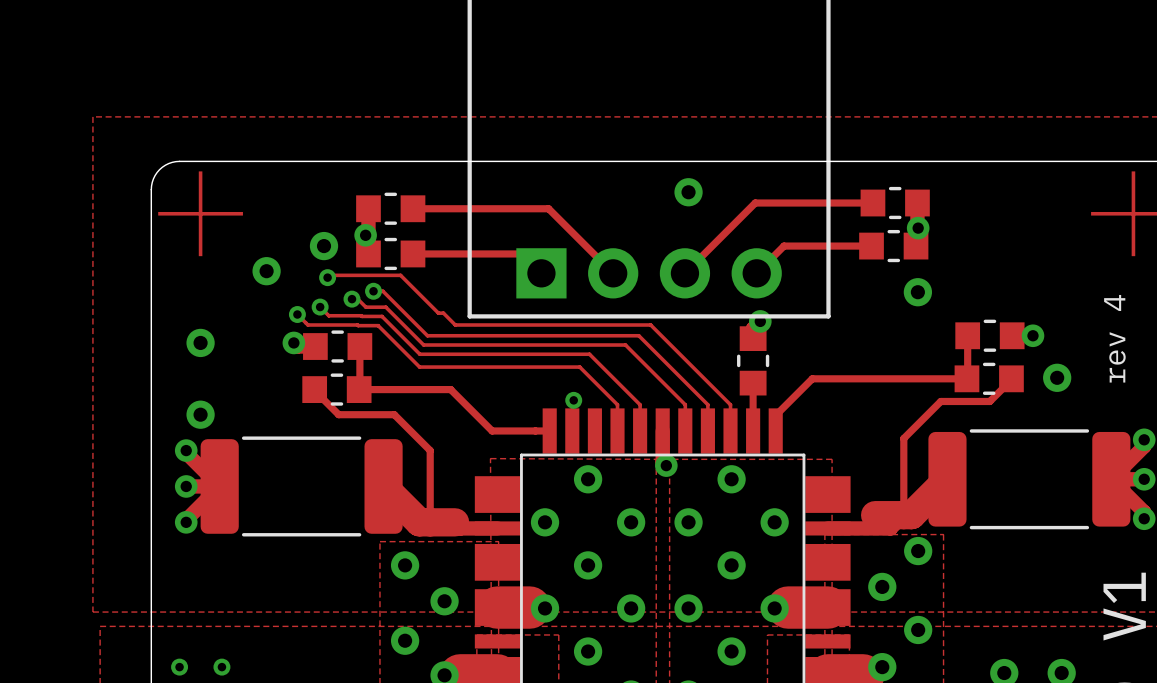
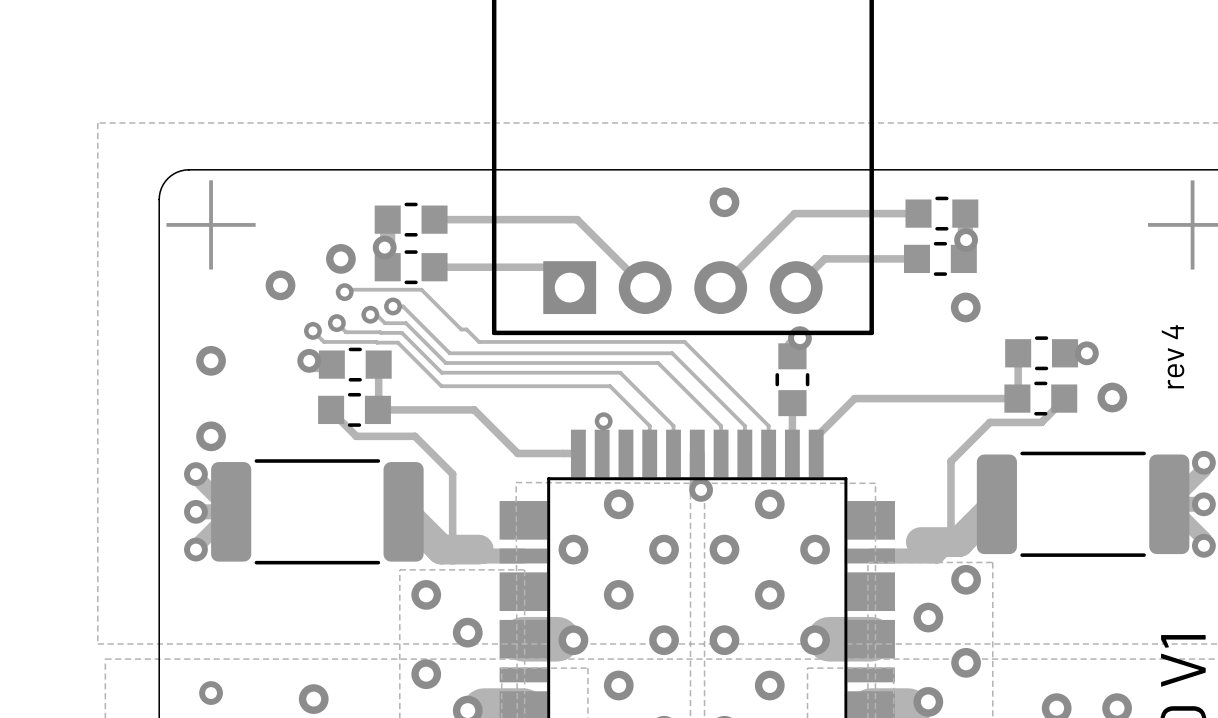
via: none -> (211, 693)
via: none -> (313, 699)
via: (179, 667) -> none
via: (221, 667) -> none

